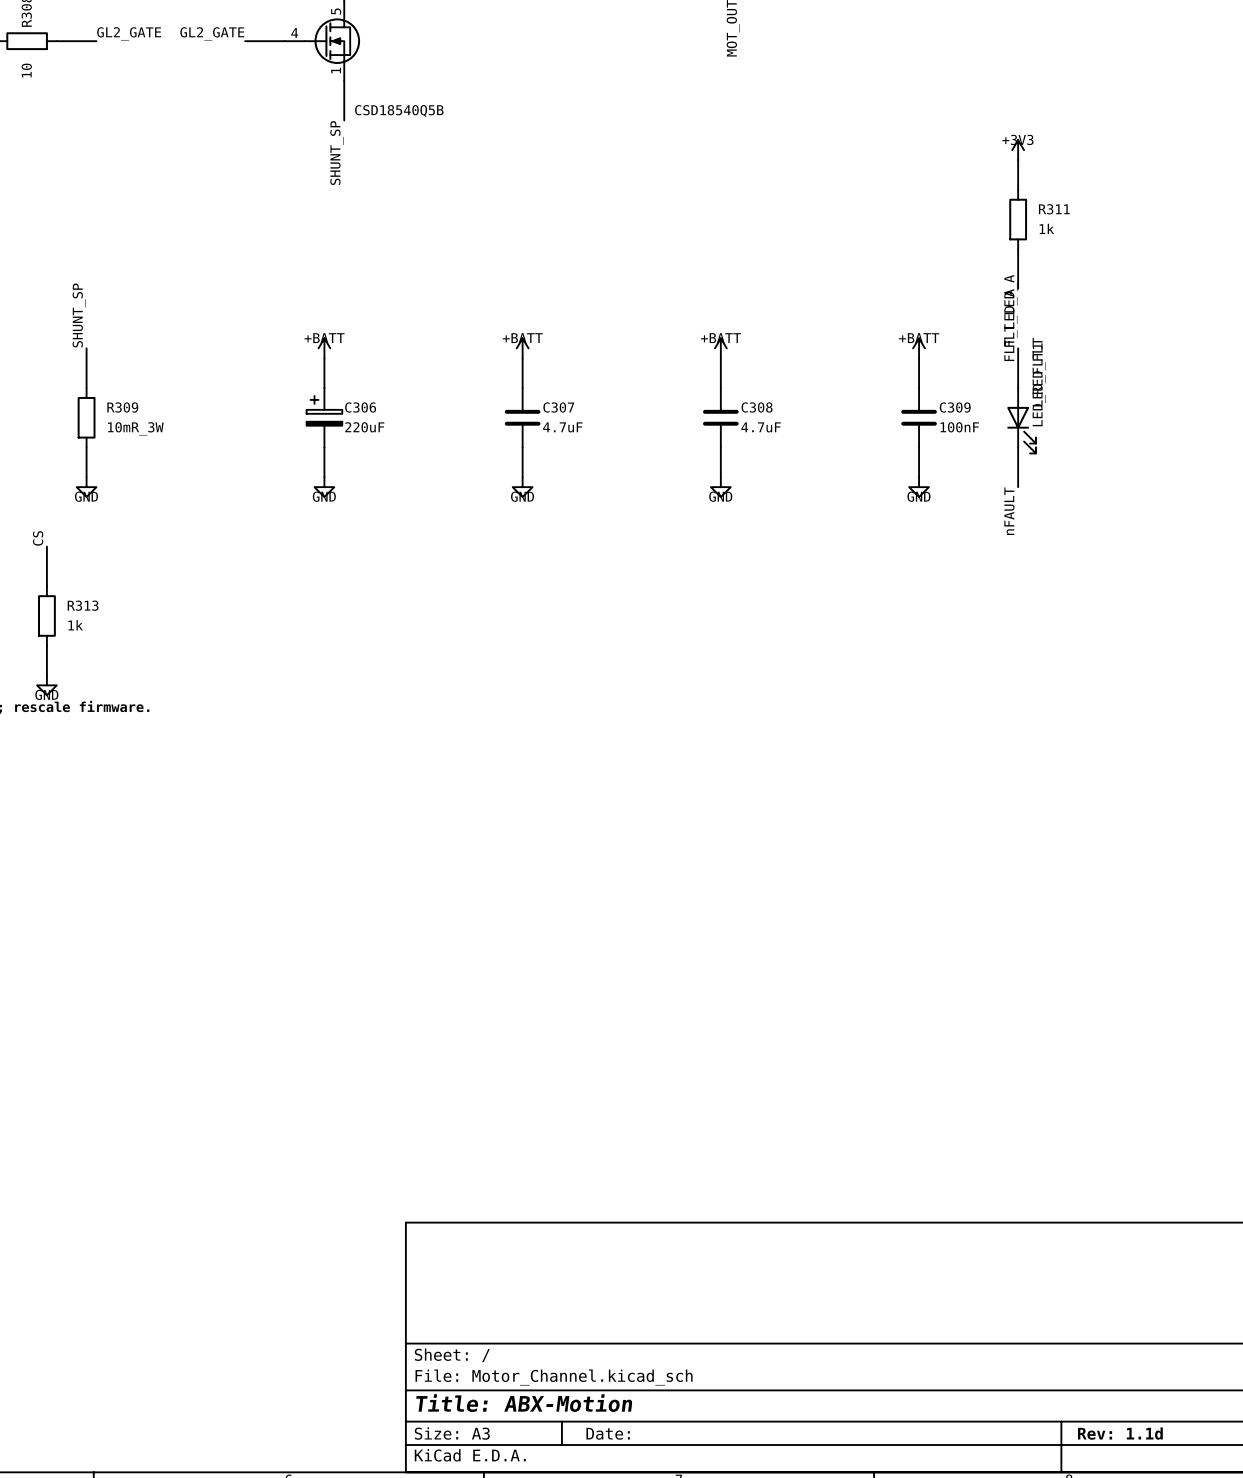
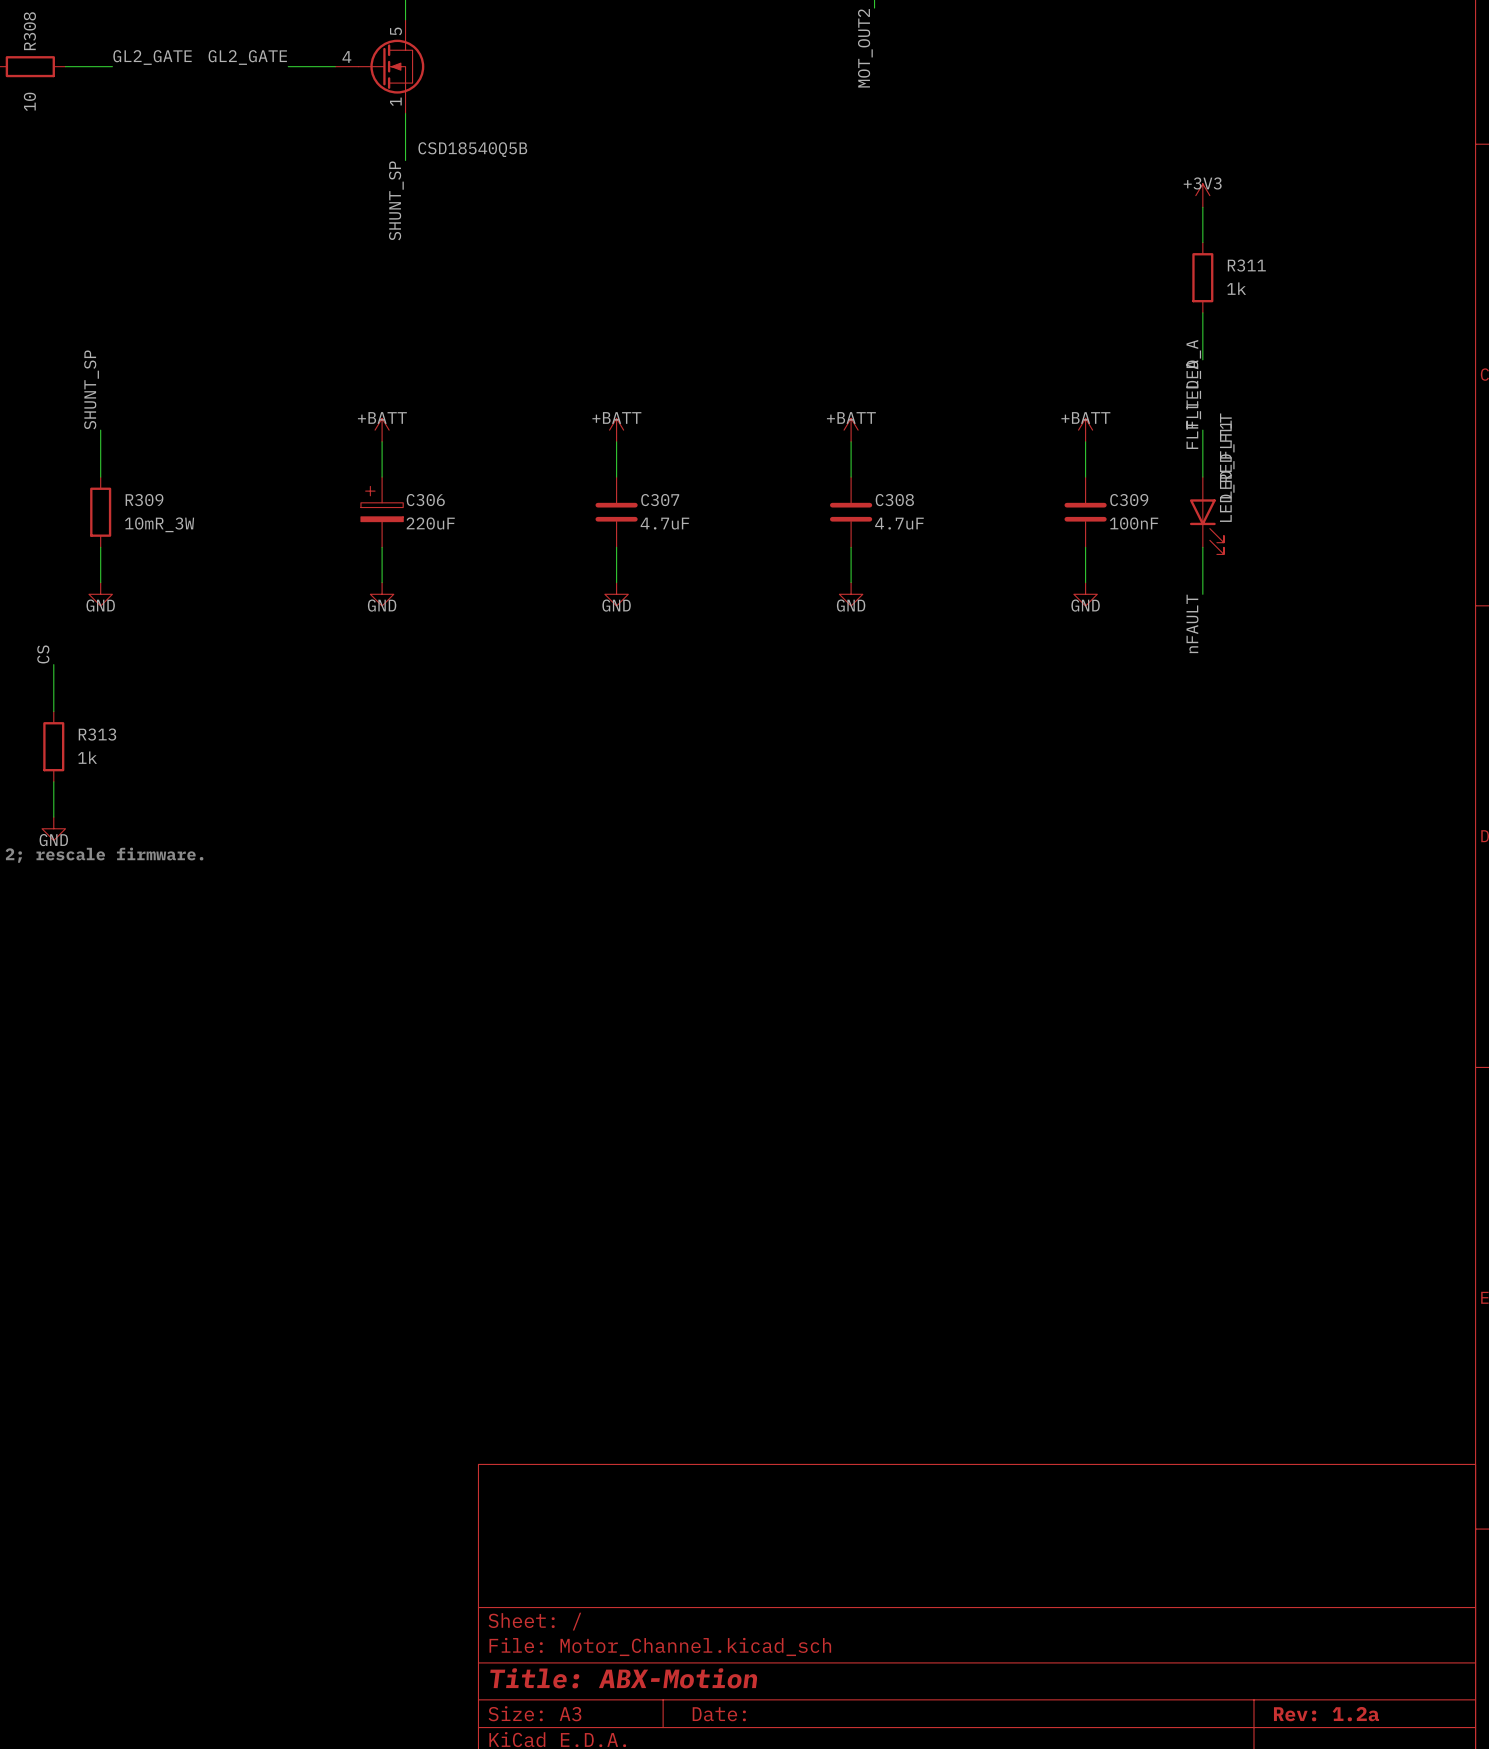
title block: Rev: 1.1d (1120, 1433) -> Rev: 1.2a (1326, 1714)

